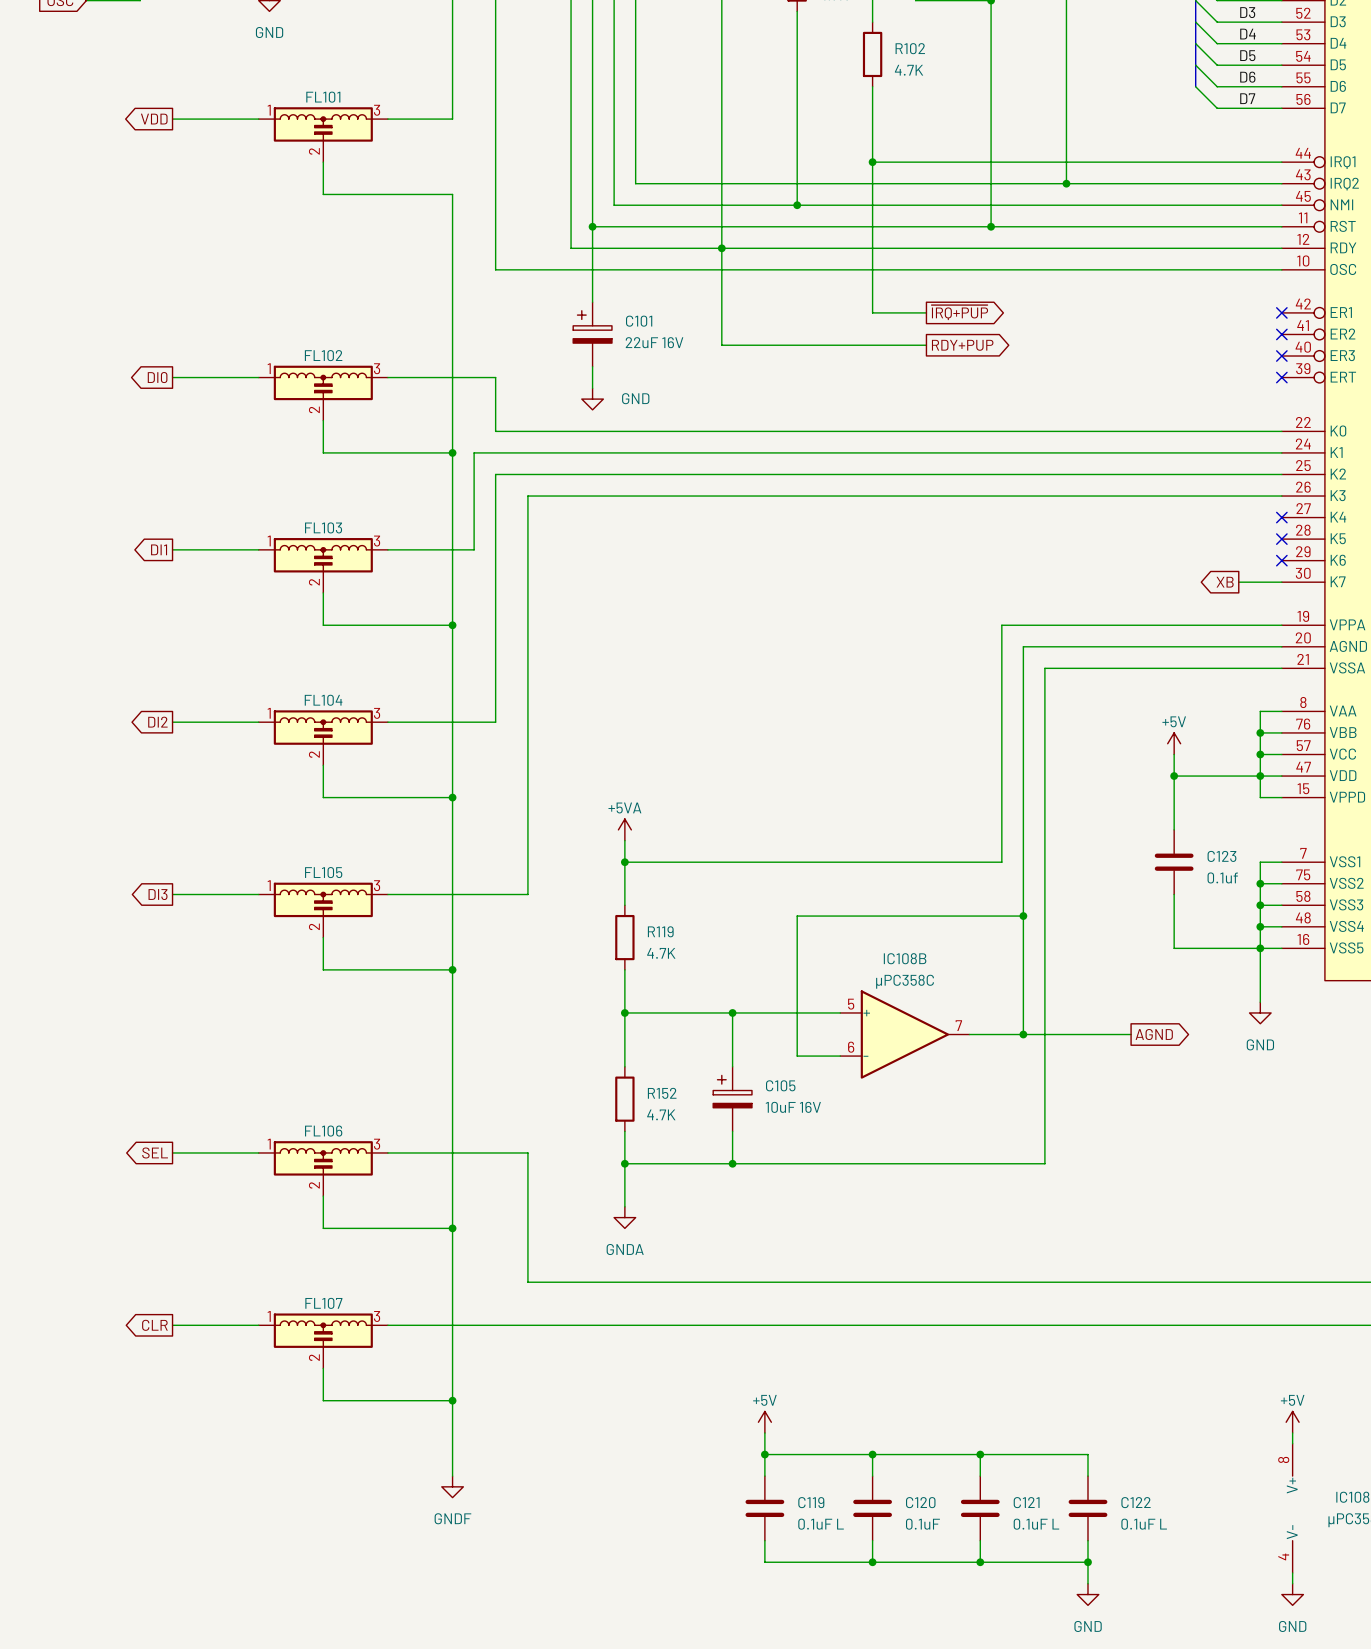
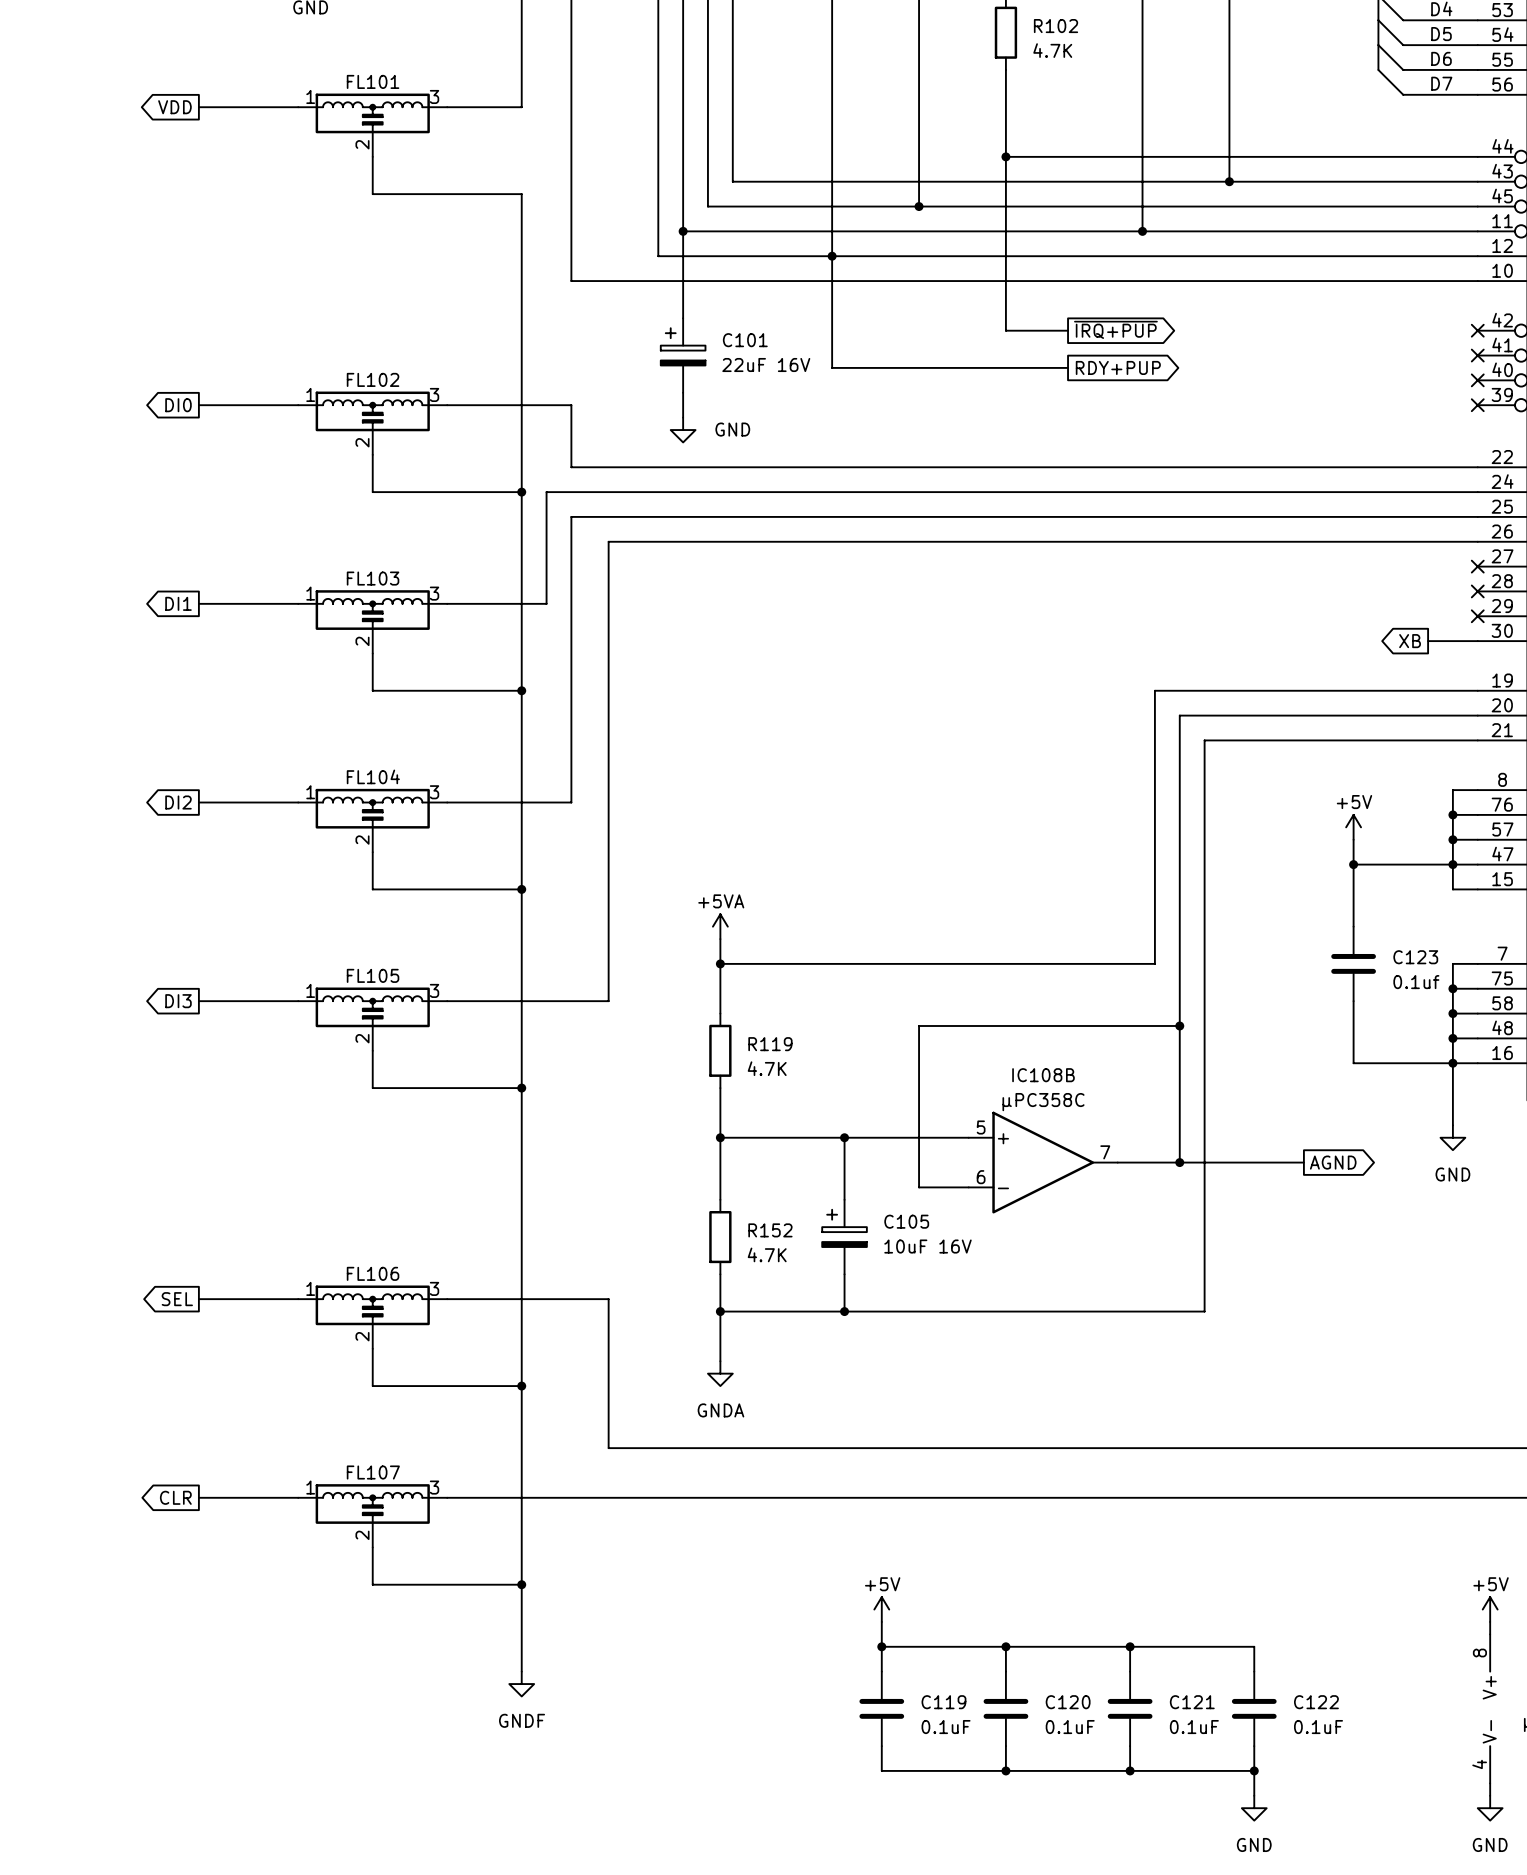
C119 value: 0.1uF L (821, 1524) -> 0.1uF (946, 1727)
C121 value: 0.1uF L (1036, 1524) -> 0.1uF (1194, 1727)
C122 value: 0.1uF L (1144, 1524) -> 0.1uF (1318, 1727)

